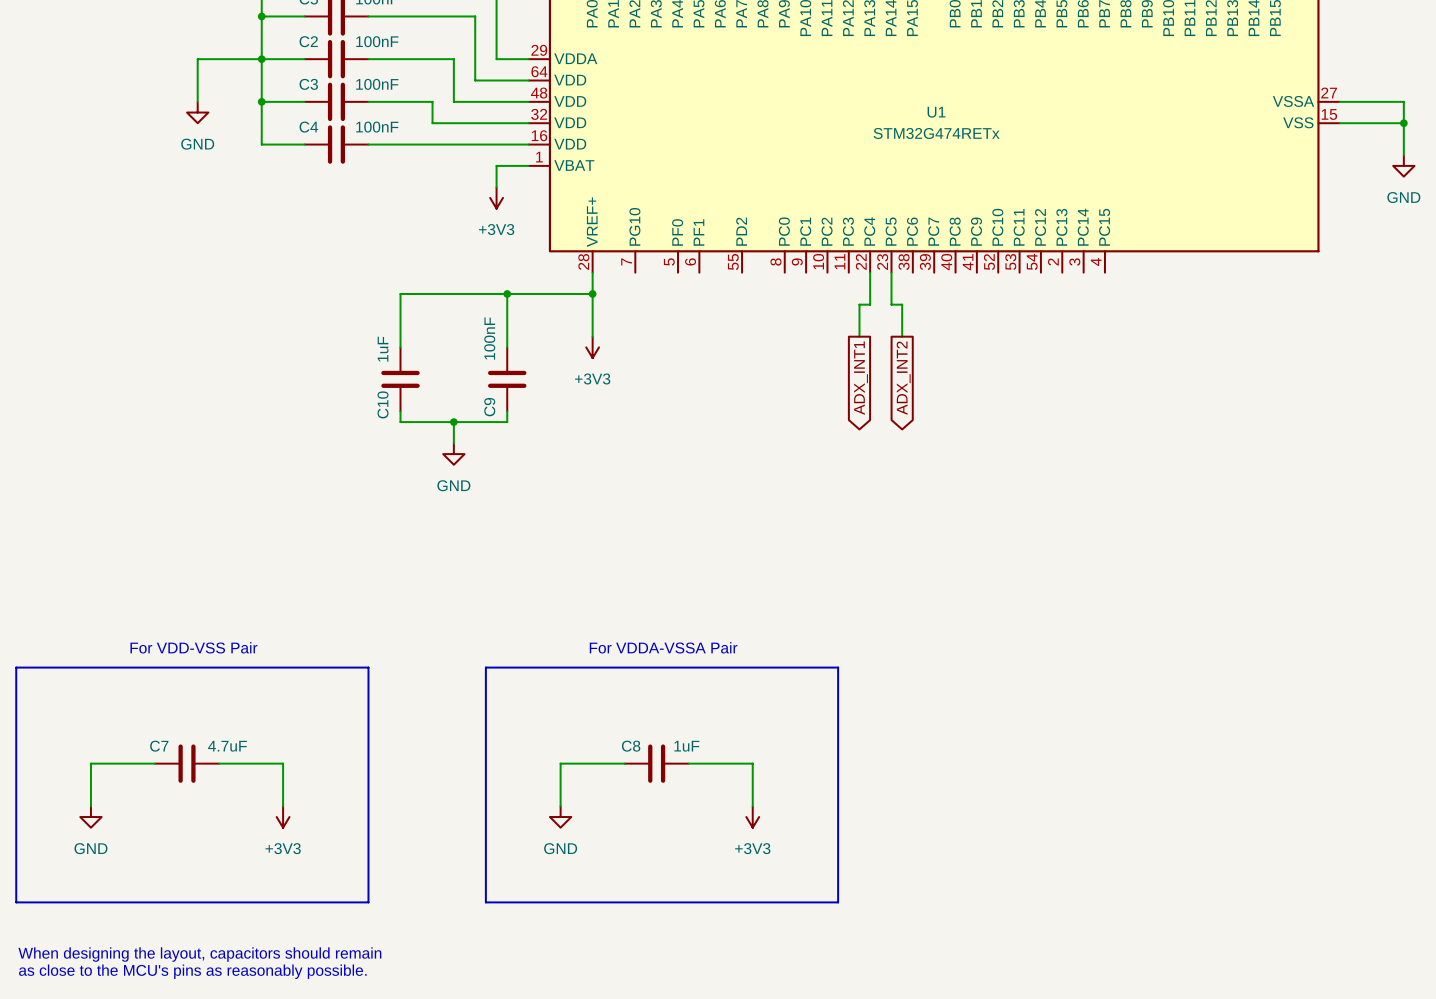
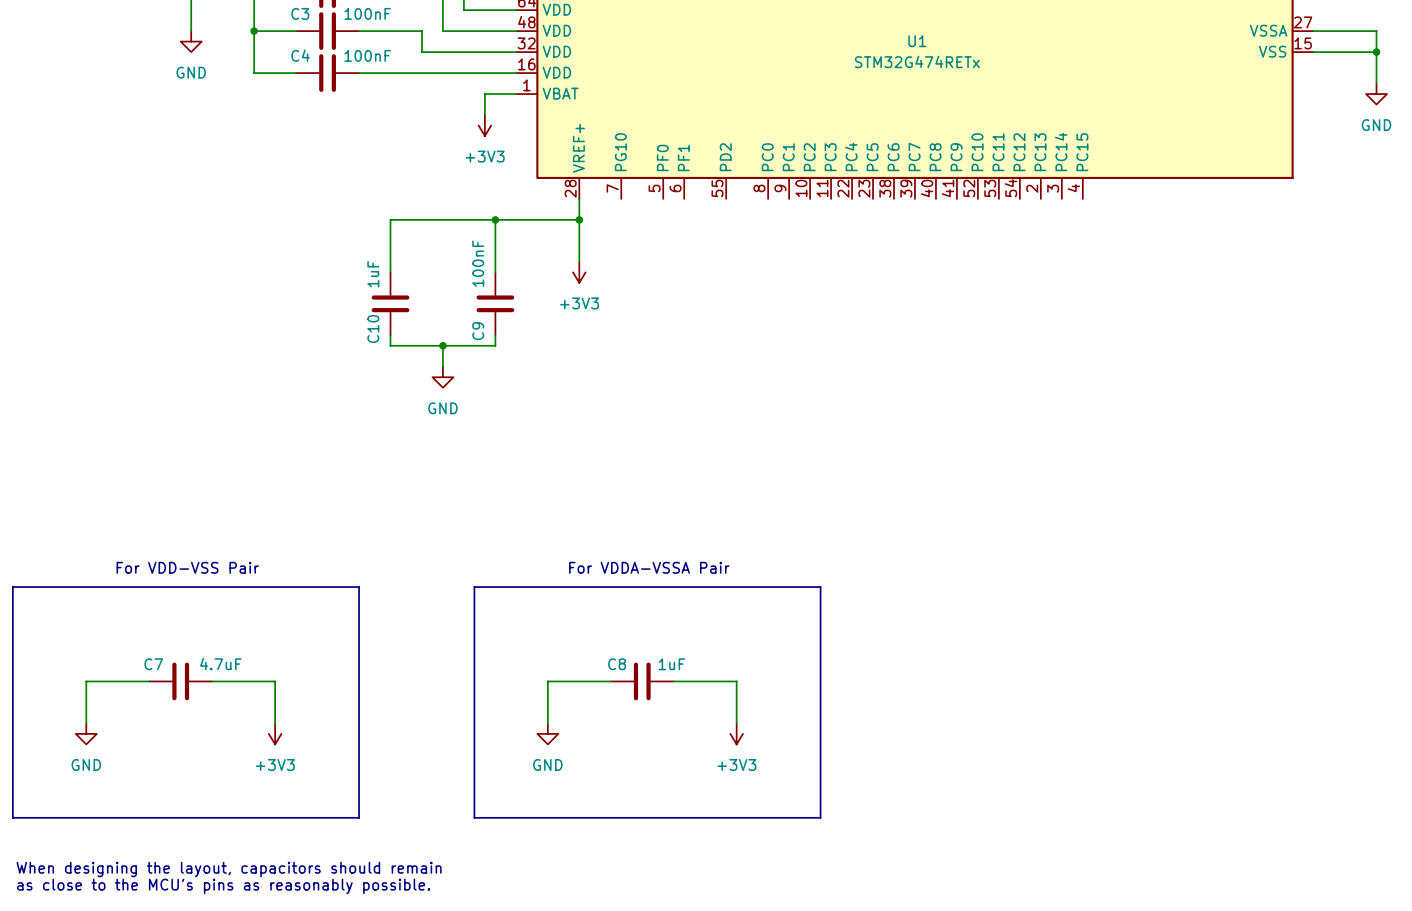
wire: (870, 272) (870, 304) (859, 304) (859, 336) -> none
wire: (891, 272) (891, 304) (902, 304) (902, 336) -> none
global label: ADX_INT1 (861, 378) -> none
global label: ADX_INT2 (903, 378) -> none

